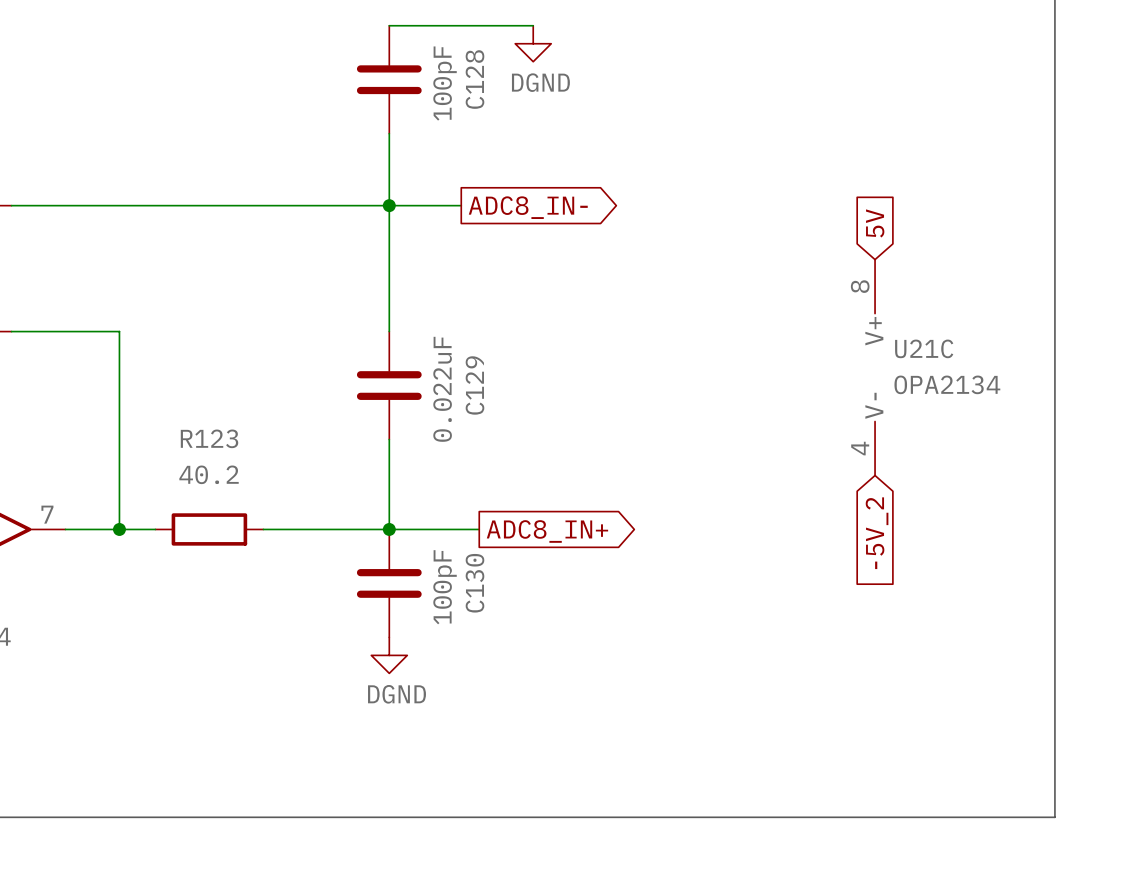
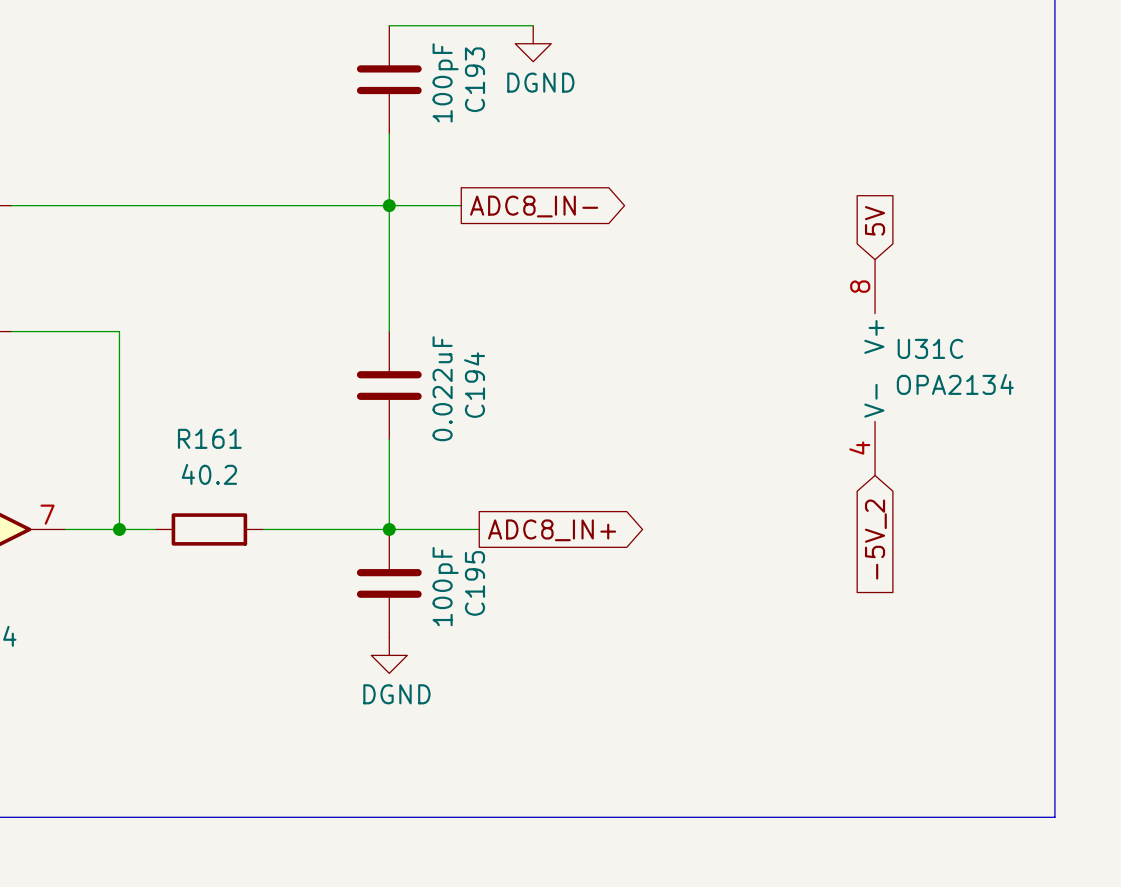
C128 name: C128 (474, 79) -> C193 (474, 79)
U21C name: U21C (924, 348) -> U31C (930, 348)
C129 name: C129 (474, 385) -> C194 (474, 385)
R123 name: R123 (209, 438) -> R161 (209, 438)
C130 name: C130 (474, 583) -> C195 (474, 583)

